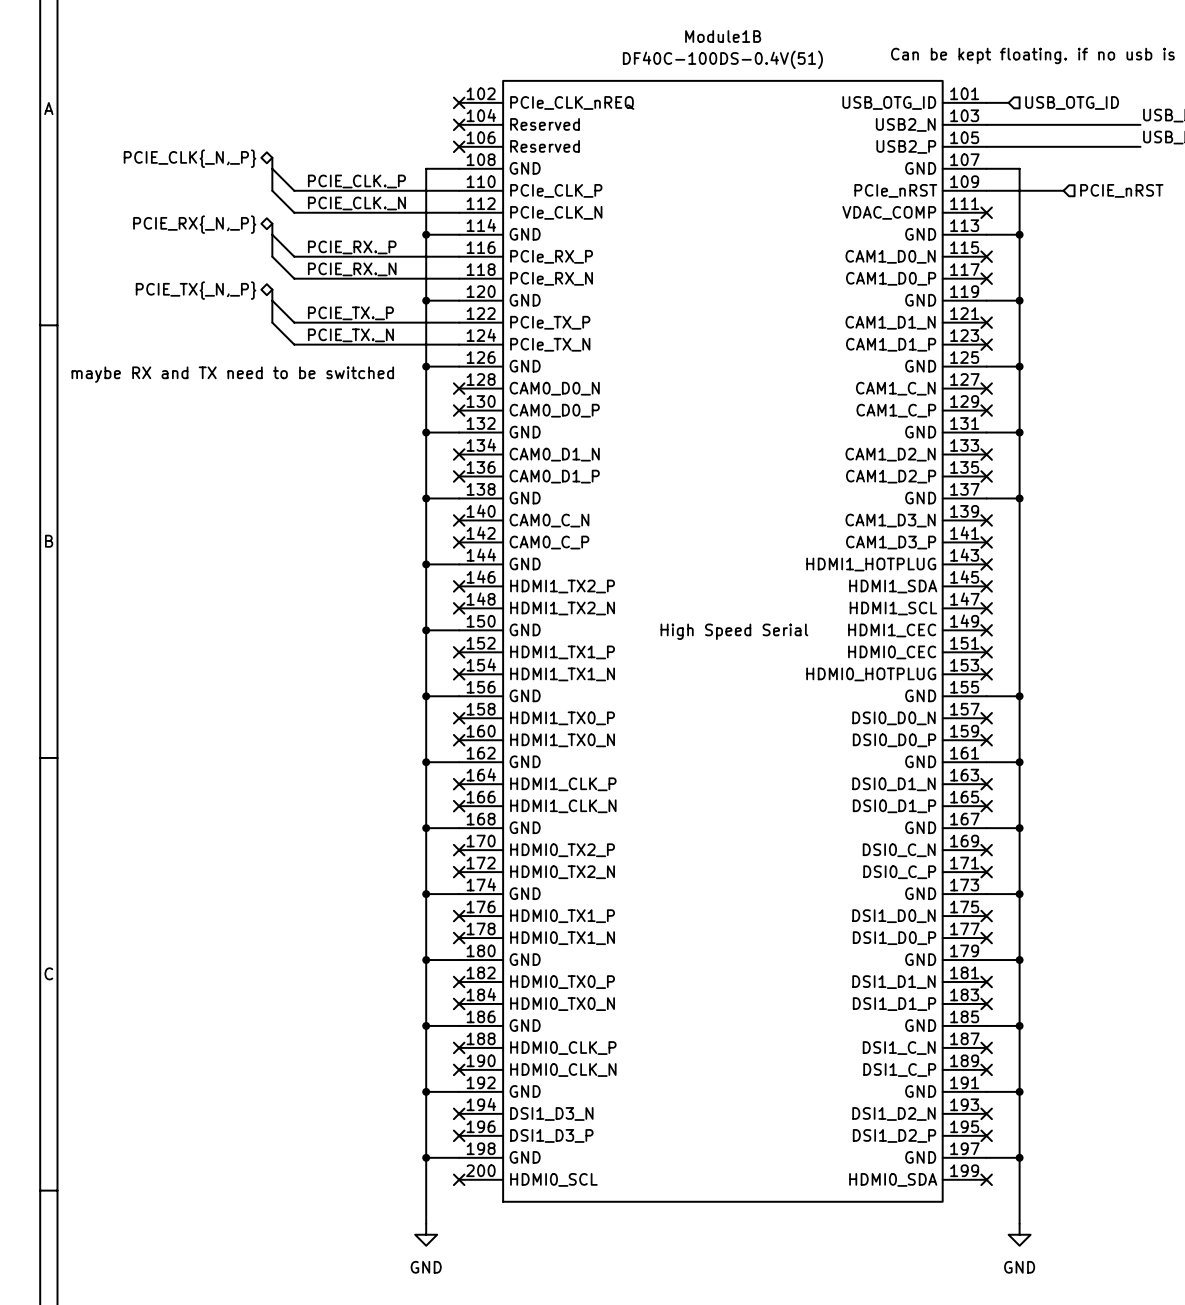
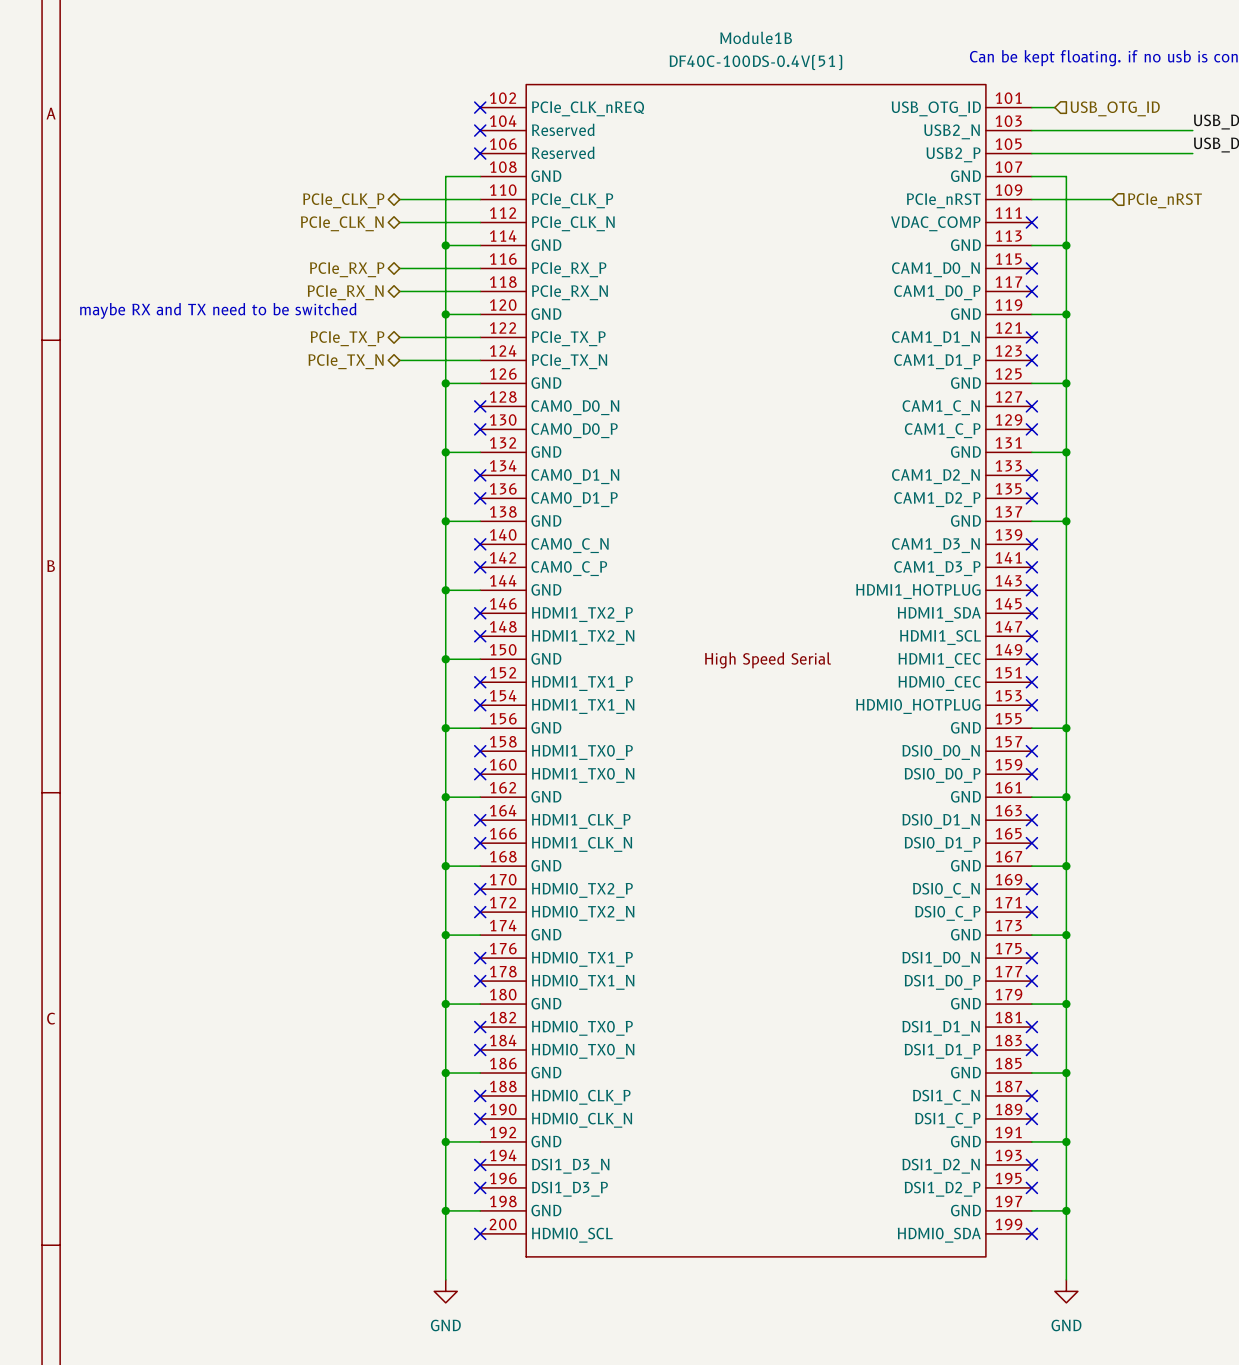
bus: (272, 157) (272, 190) -> none
hierarchical label: PCIE_CLK{_N,_P} (190, 158) -> none
wire: (272, 168) (294, 190) (382, 190) -> none
label: PCIE_CLK._P (356, 181) -> none
wire: (272, 190) (294, 212) (382, 212) -> none
hierarchical label: none -> PCIe_CLK_P (343, 200)
hierarchical label: PCIE_nRST (1121, 190) -> PCIe_nRST (1165, 200)
label: PCIE_CLK._N (356, 203) -> none
hierarchical label: none -> PCIe_CLK_N (342, 223)
bus: (272, 223) (272, 256) -> none
hierarchical label: PCIE_RX{_N,_P} (194, 224) -> none
wire: (272, 234) (294, 256) (382, 256) -> none
label: PCIE_RX._P (352, 247) -> none
wire: (272, 256) (294, 278) (382, 278) -> none
hierarchical label: none -> PCIe_RX_P (347, 269)
label: PCIE_RX._N (352, 269) -> none
hierarchical label: none -> PCIe_RX_N (345, 292)
bus: (272, 289) (272, 322) -> none
hierarchical label: PCIE_TX{_N,_P} (196, 290) -> none
wire: (272, 300) (294, 322) (382, 322) -> none
label: PCIE_TX._P (350, 313) -> none
wire: (272, 322) (294, 344) (382, 344) -> none
hierarchical label: none -> PCIe_TX_P (347, 338)
label: PCIE_TX._N (350, 335) -> none
hierarchical label: none -> PCIe_TX_N (346, 361)
text position: maybe RX and TX need to be switched (232, 374) -> maybe RX and TX need to be switched (218, 310)

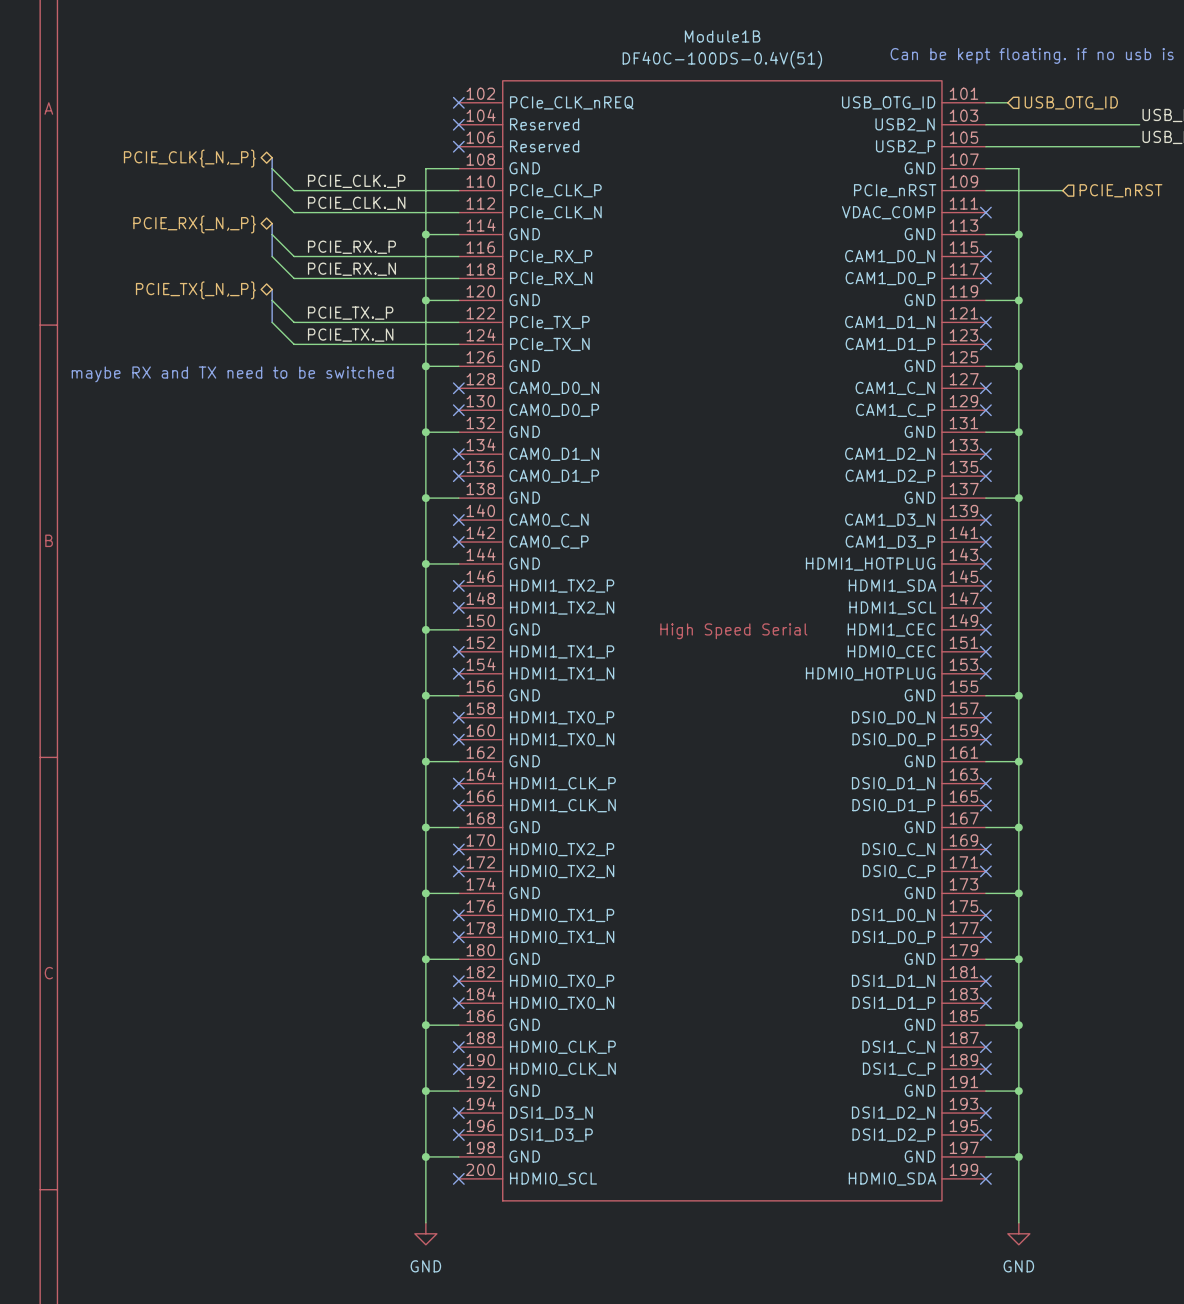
bus: none -> (272, 157) (272, 190)
hierarchical label: none -> PCIE_CLK{_N,_P} (189, 158)
wire: none -> (272, 168) (294, 190) (381, 190)
label: none -> PCIE_CLK._P (356, 181)
wire: none -> (272, 190) (294, 212) (381, 212)
hierarchical label: PCIe_CLK_P (343, 200) -> none
hierarchical label: PCIe_nRST (1165, 200) -> PCIE_nRST (1120, 190)
label: none -> PCIE_CLK._N (356, 203)
hierarchical label: PCIe_CLK_N (342, 223) -> none
bus: none -> (272, 223) (272, 256)
hierarchical label: none -> PCIE_RX{_N,_P} (194, 224)
wire: none -> (272, 234) (294, 256) (381, 256)
label: none -> PCIE_RX._P (351, 247)
wire: none -> (272, 256) (294, 278) (381, 278)
hierarchical label: PCIe_RX_P (347, 269) -> none
label: none -> PCIE_RX._N (351, 269)
hierarchical label: PCIe_RX_N (345, 292) -> none
bus: none -> (272, 289) (272, 322)
hierarchical label: none -> PCIE_TX{_N,_P} (195, 290)
text position: maybe RX and TX need to be switched (218, 310) -> maybe RX and TX need to be switched (232, 374)
wire: none -> (272, 300) (294, 322) (381, 322)
label: none -> PCIE_TX._P (350, 313)
wire: none -> (272, 322) (294, 344) (381, 344)
hierarchical label: PCIe_TX_P (347, 338) -> none
label: none -> PCIE_TX._N (350, 335)
hierarchical label: PCIe_TX_N (346, 361) -> none

